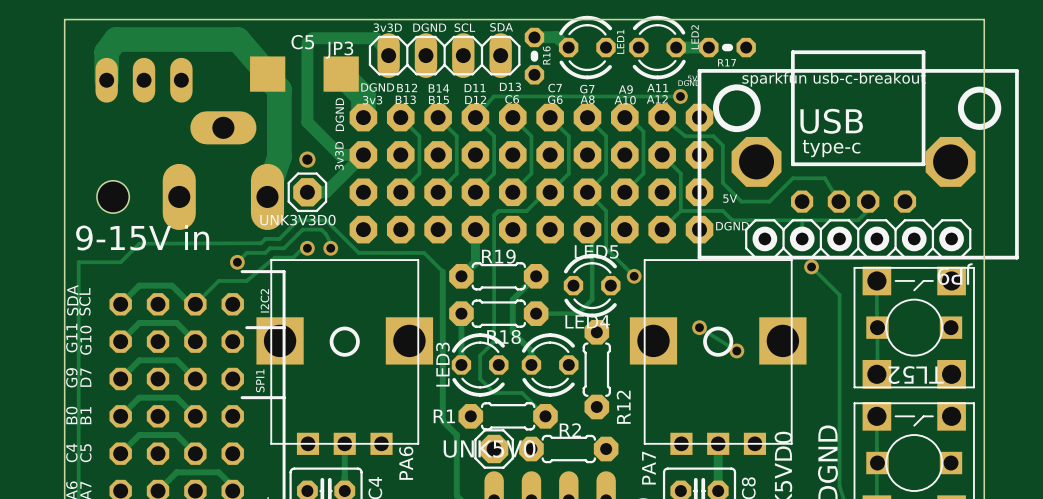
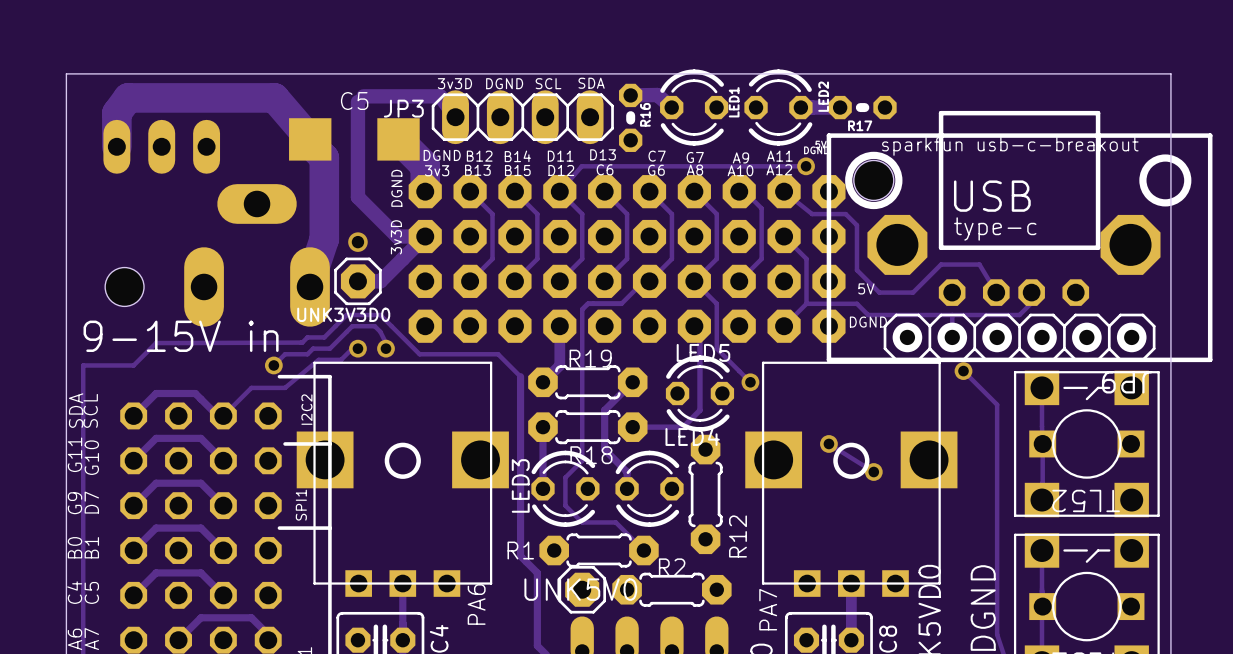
part: none -> (873, 180)

